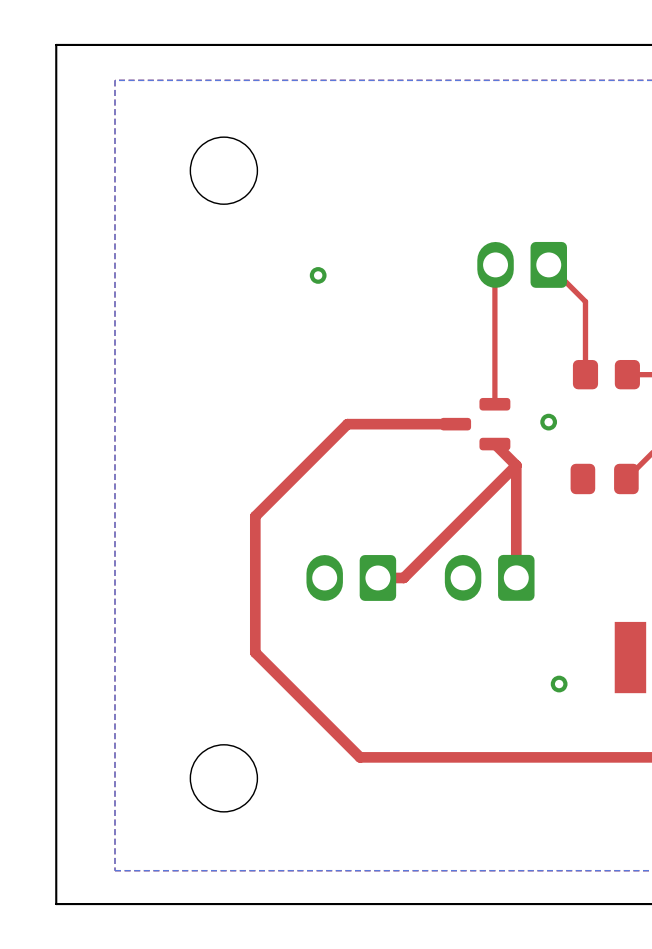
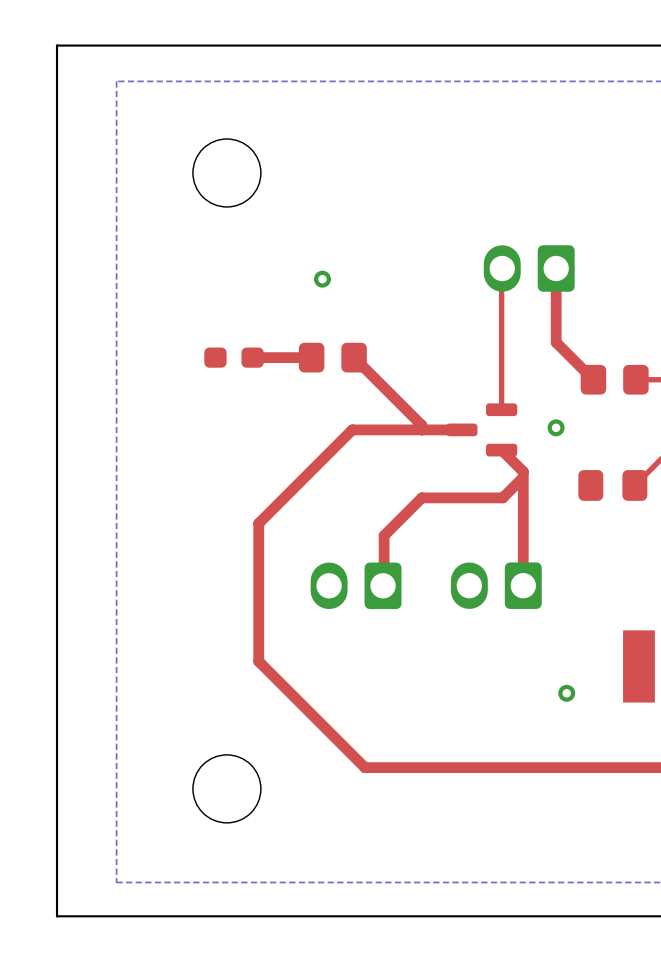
top track: (548, 264) (585, 301) (585, 374) -> (556, 268) (556, 342) (593, 379)
part: none -> (234, 357)
top track: none -> (311, 357) (252, 357)
part: none -> (332, 357)
top track: none -> (354, 357) (421, 425) (421, 429)
top track: (516, 465) (403, 577) (377, 577) -> none
top track: none -> (521, 478) (502, 497) (421, 497) (384, 535) (384, 584)

